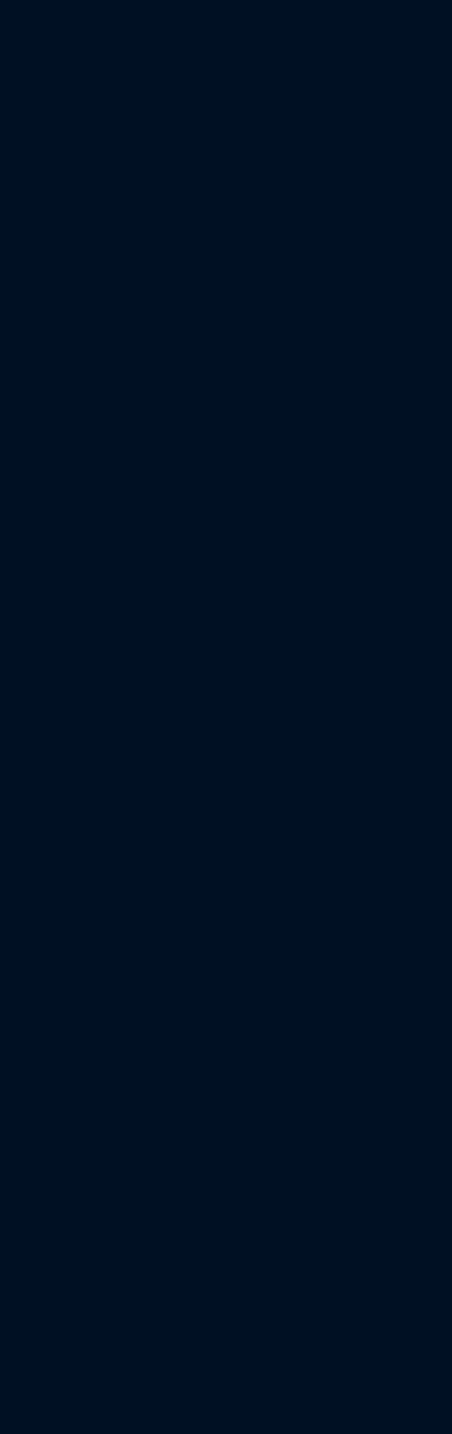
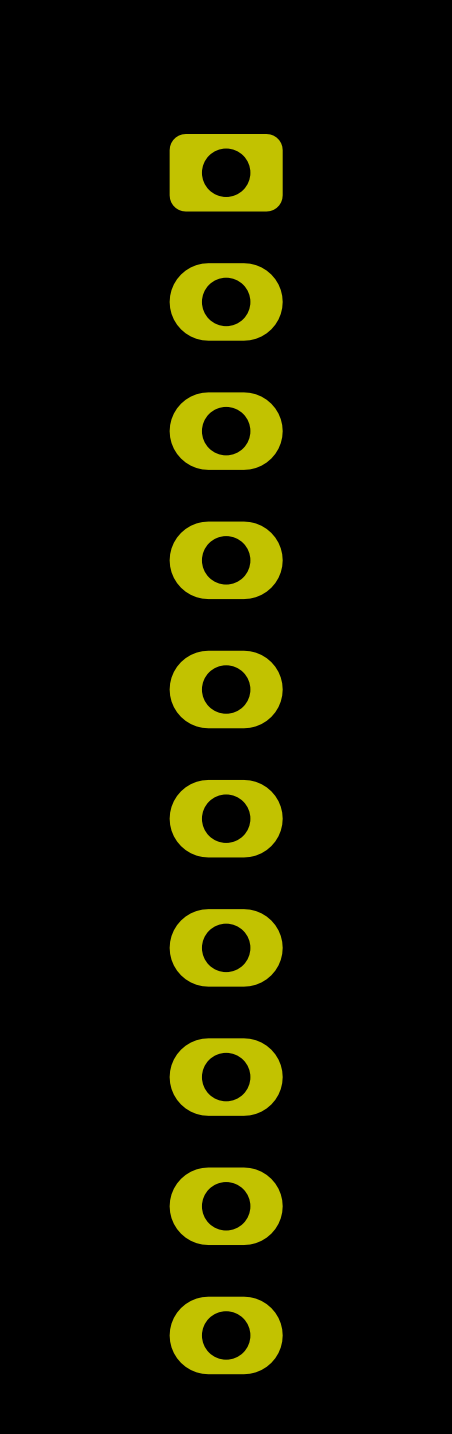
part: none -> (226, 754)

